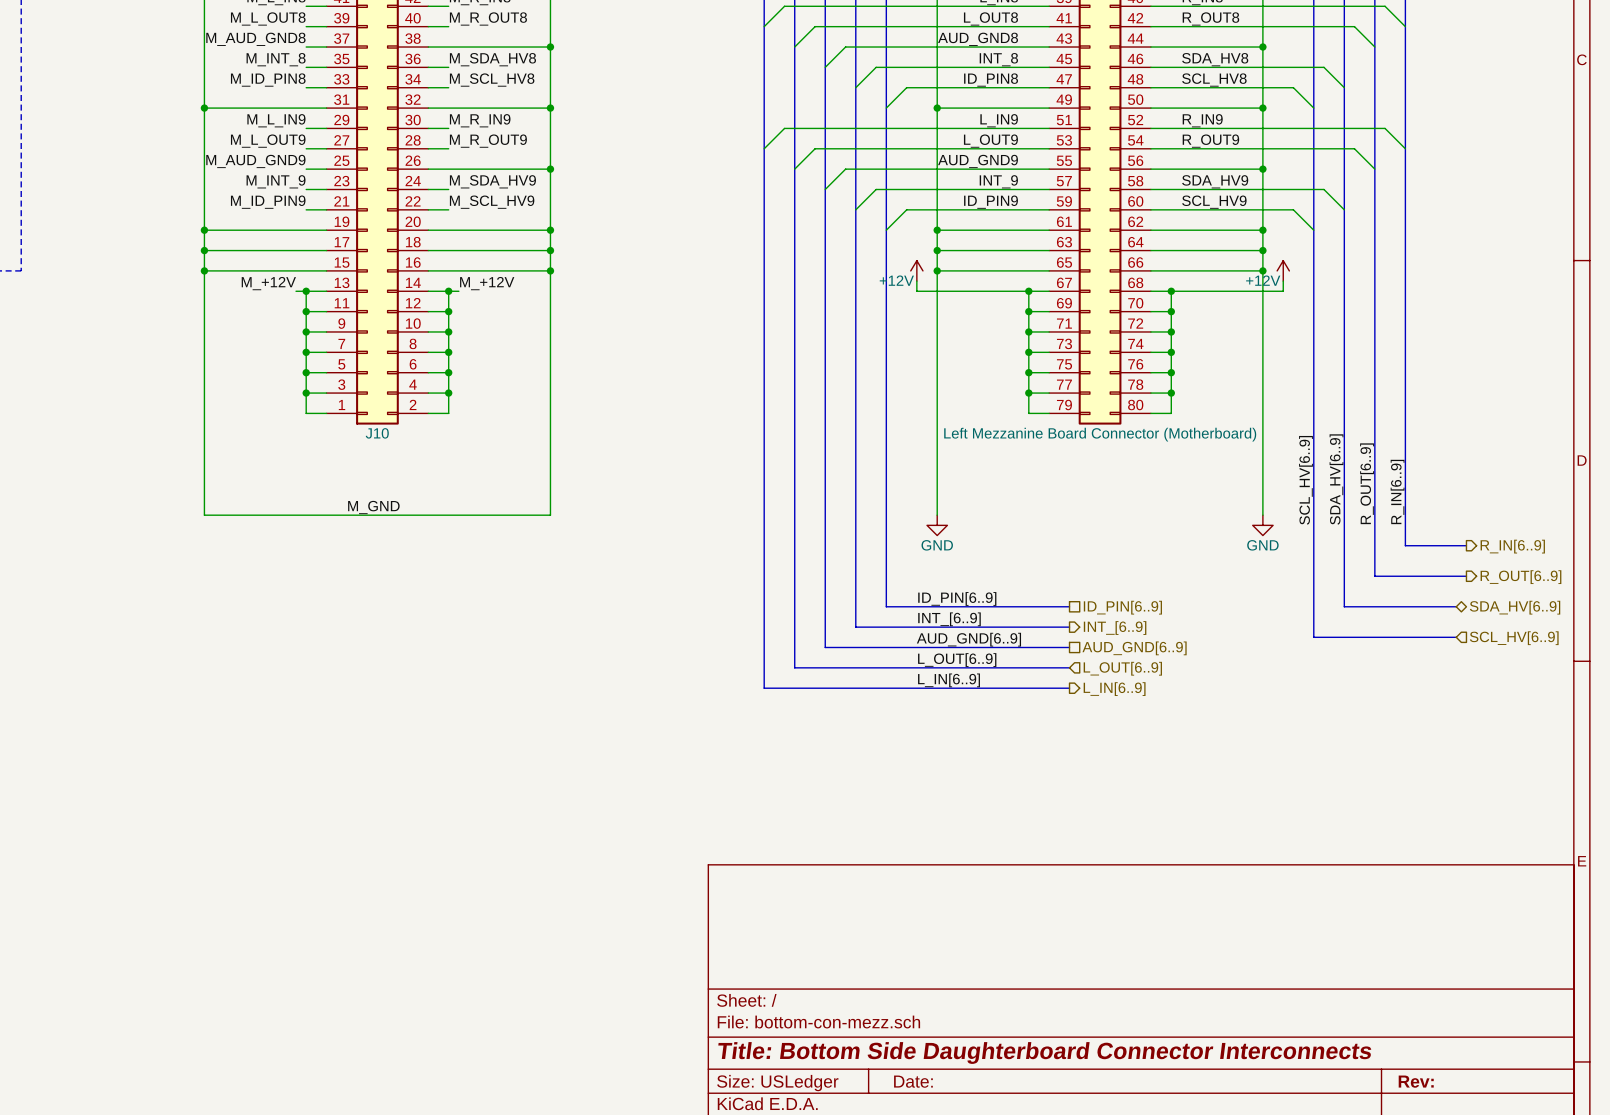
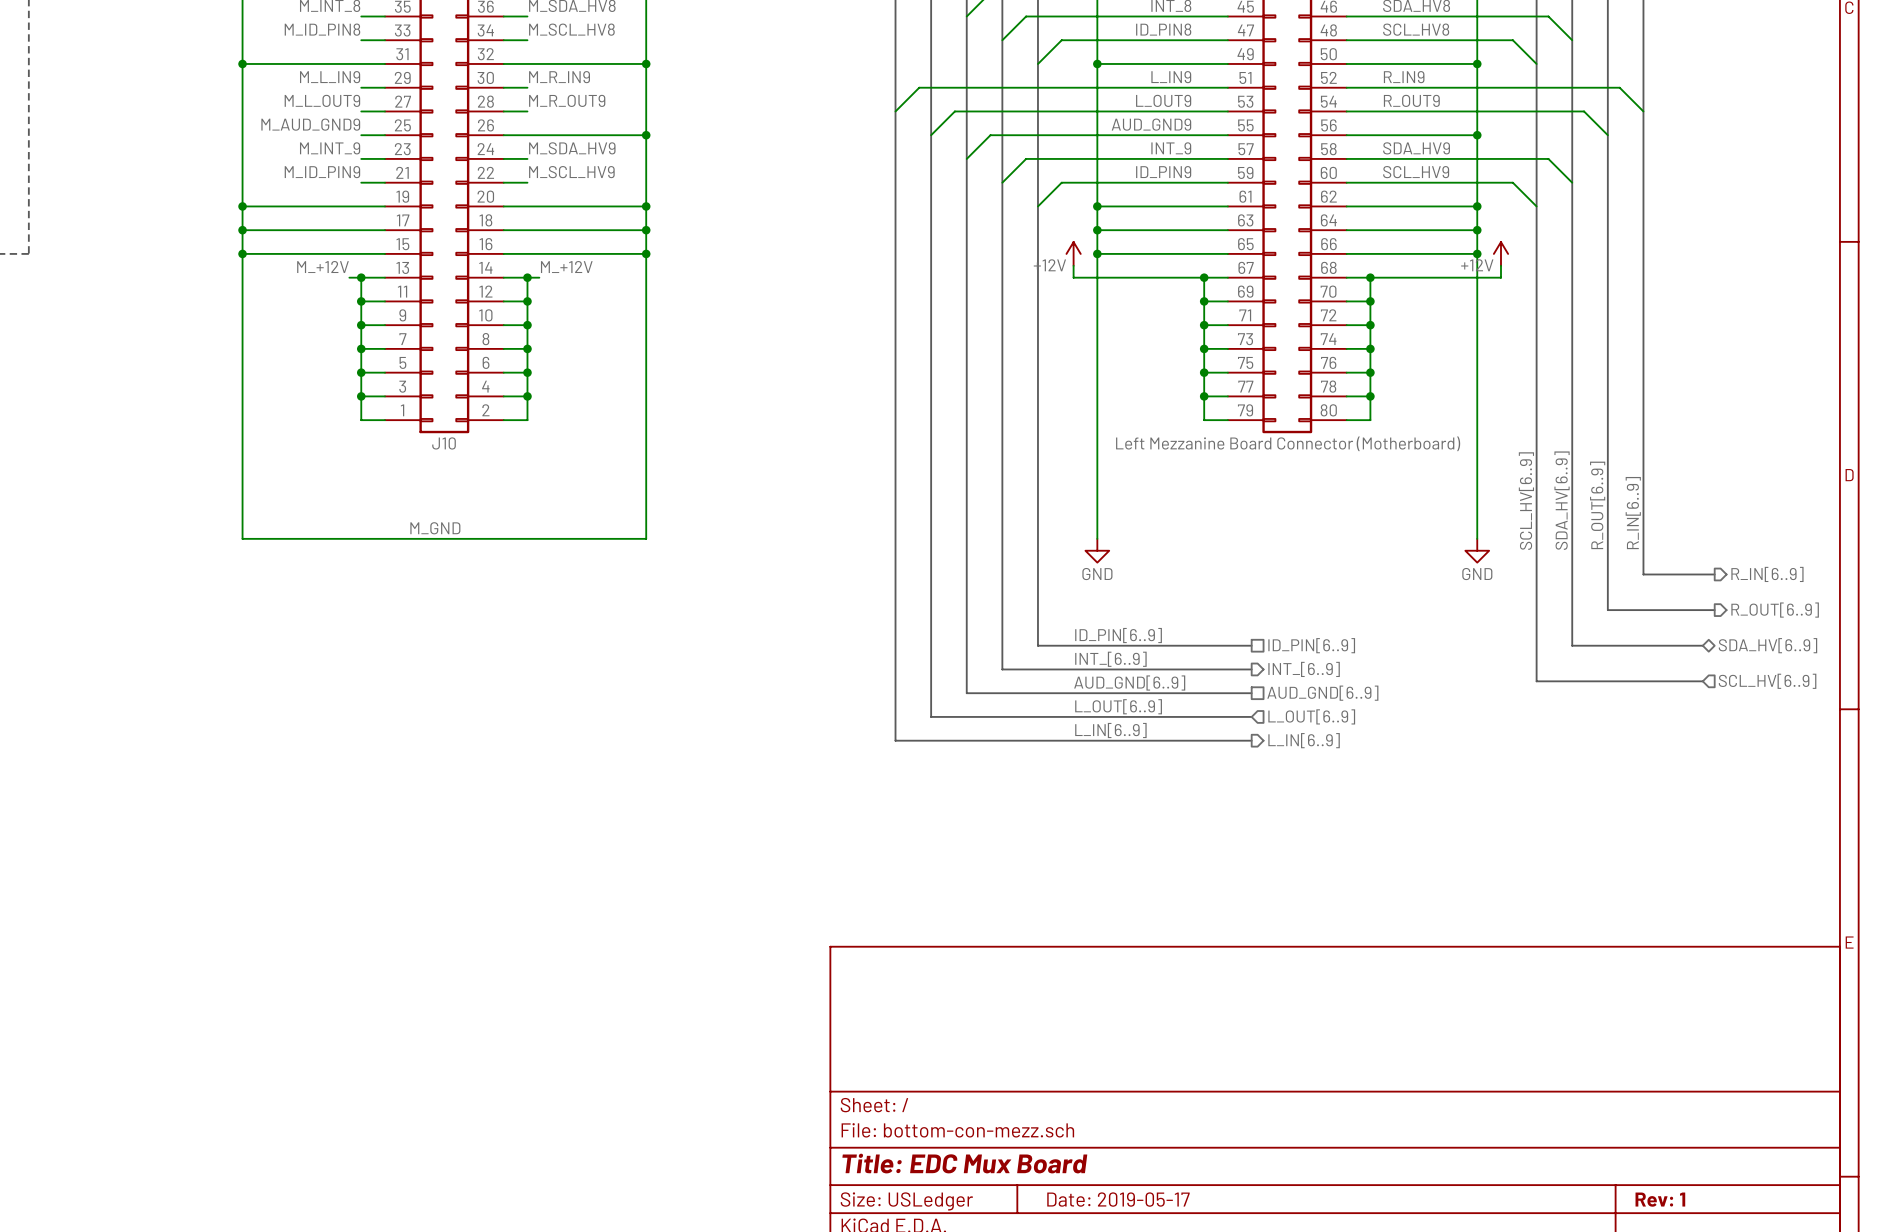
title block: Title: Bottom Side Daughterboard Connector Interconnects (1044, 1052) -> Title: EDC Mux Board (964, 1163)
title block: Date: (913, 1081) -> Date: 2019-05-17 (1118, 1199)
title block: Rev: (1416, 1081) -> Rev: 1 (1660, 1199)

